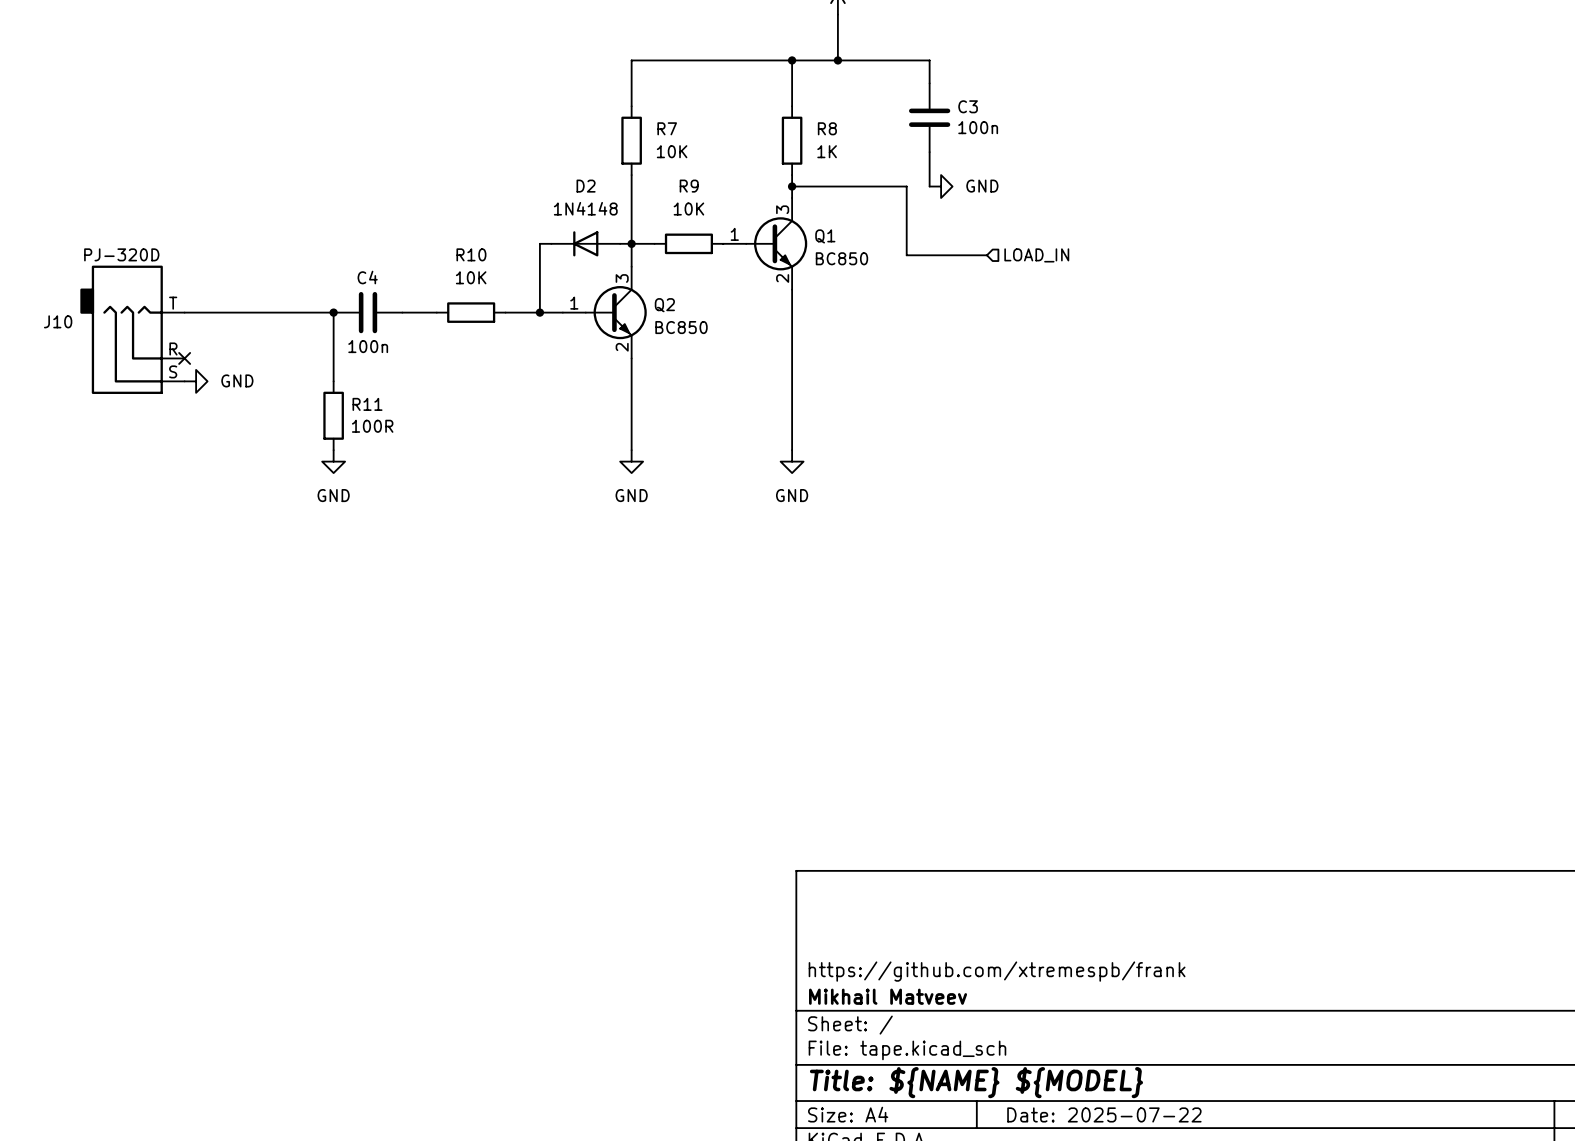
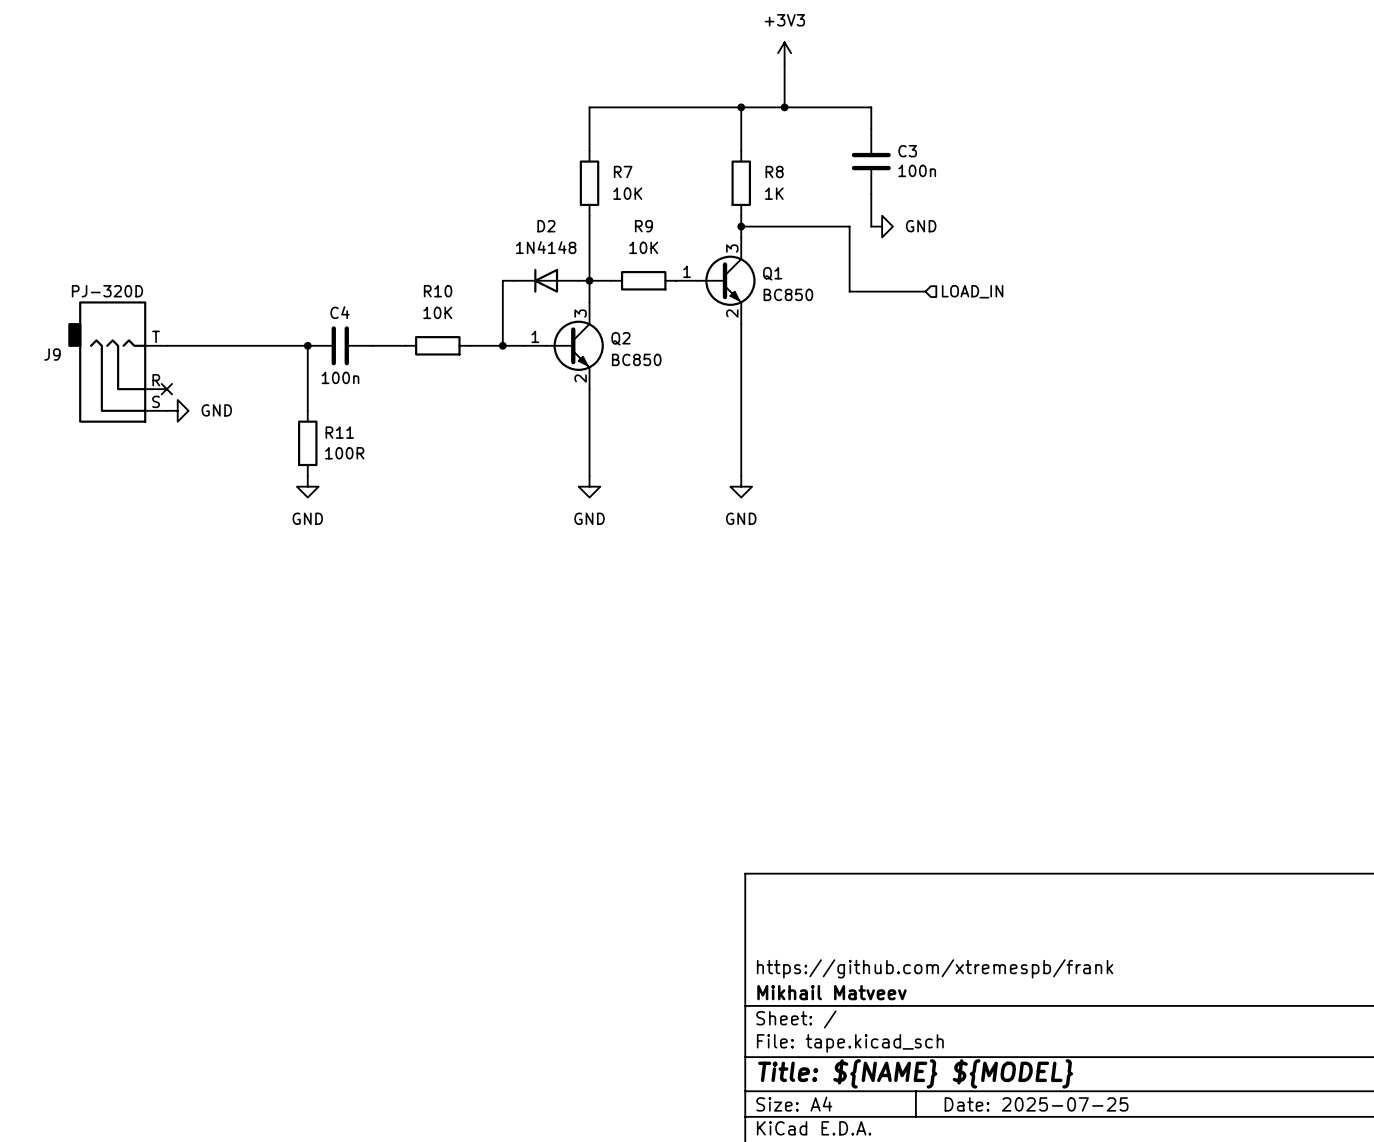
J10 name: J10 (58, 321) -> J9 (52, 354)
title block: Date: 2025-07-22 (1104, 1114) -> Date: 2025-07-25 (1036, 1104)

